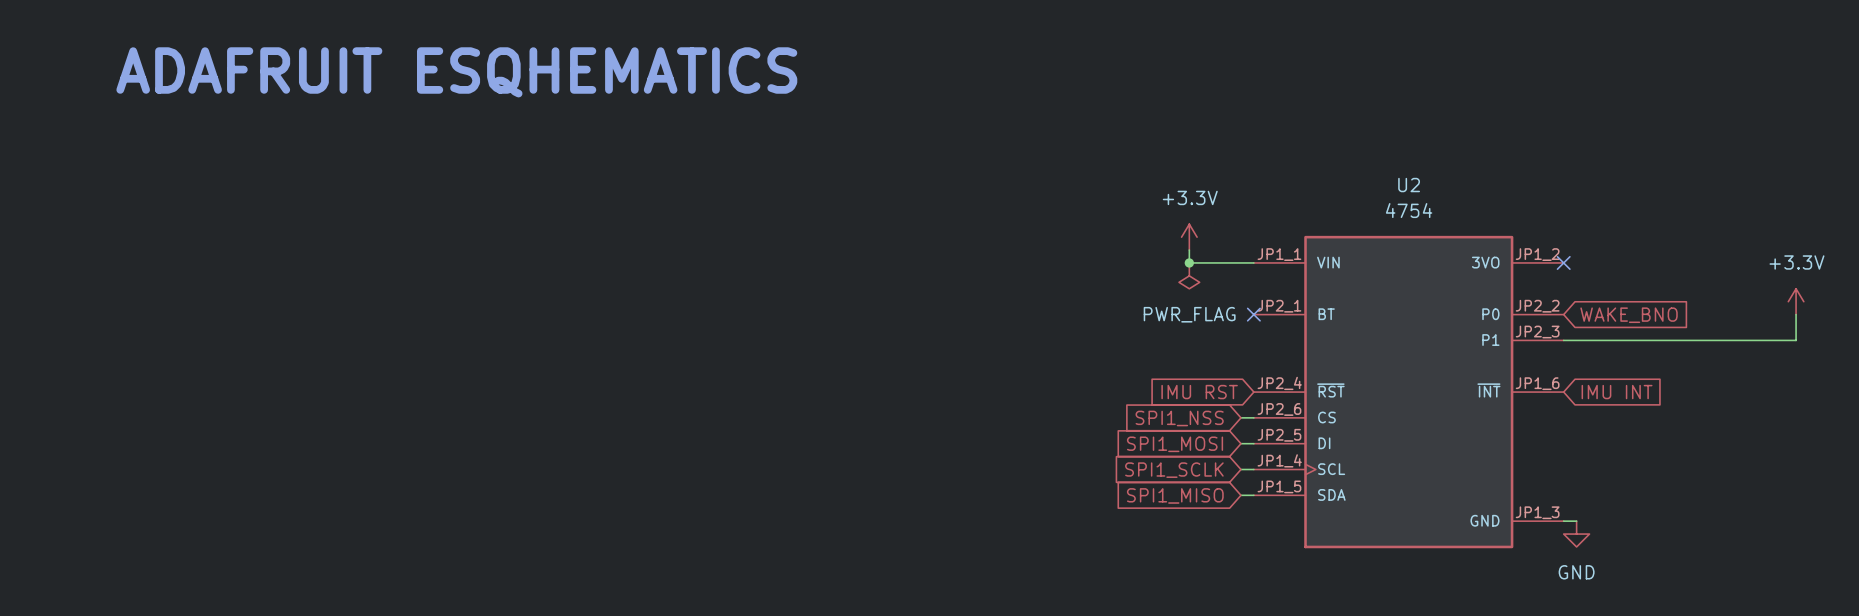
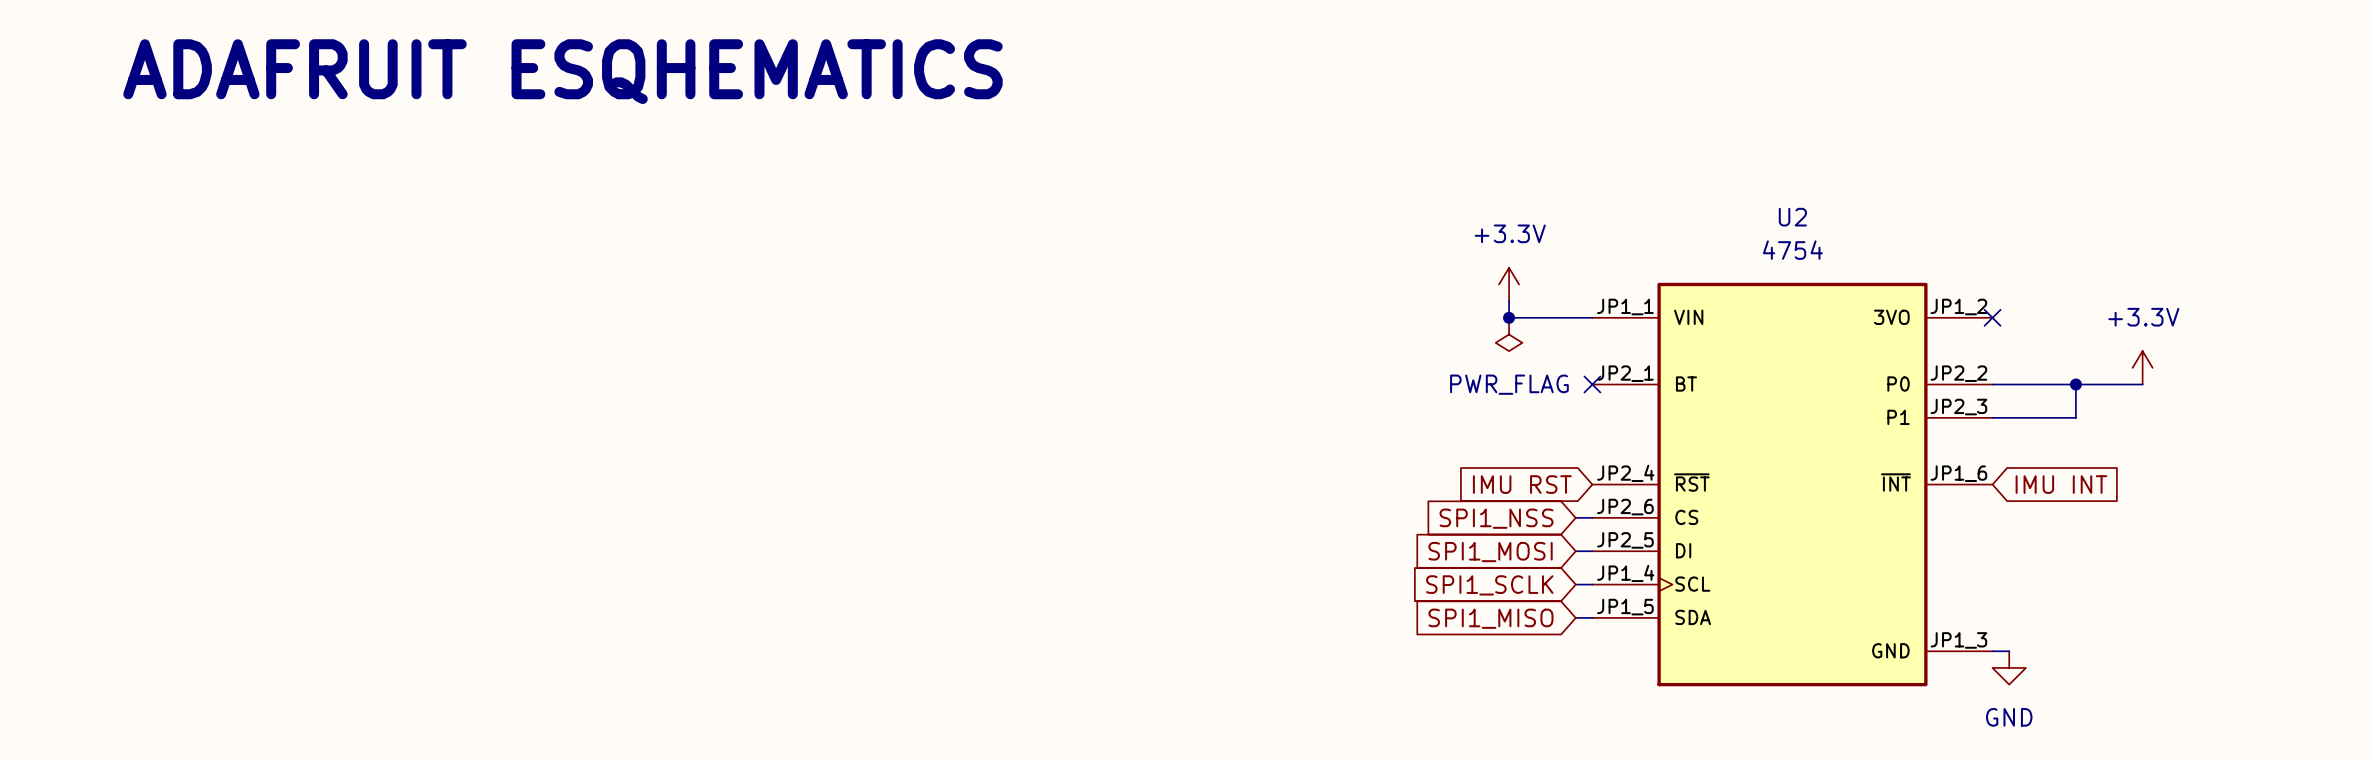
power symbol position: +3.3V (1796, 301) -> +3.3V (2142, 367)
wire: none -> (1992, 384) (2142, 384)
junction: none -> (2075, 384)
wire: (1796, 314) (1796, 340) (1628, 340) -> (2075, 384) (2075, 417)
global label: WAKE_BNO (1629, 315) -> none

